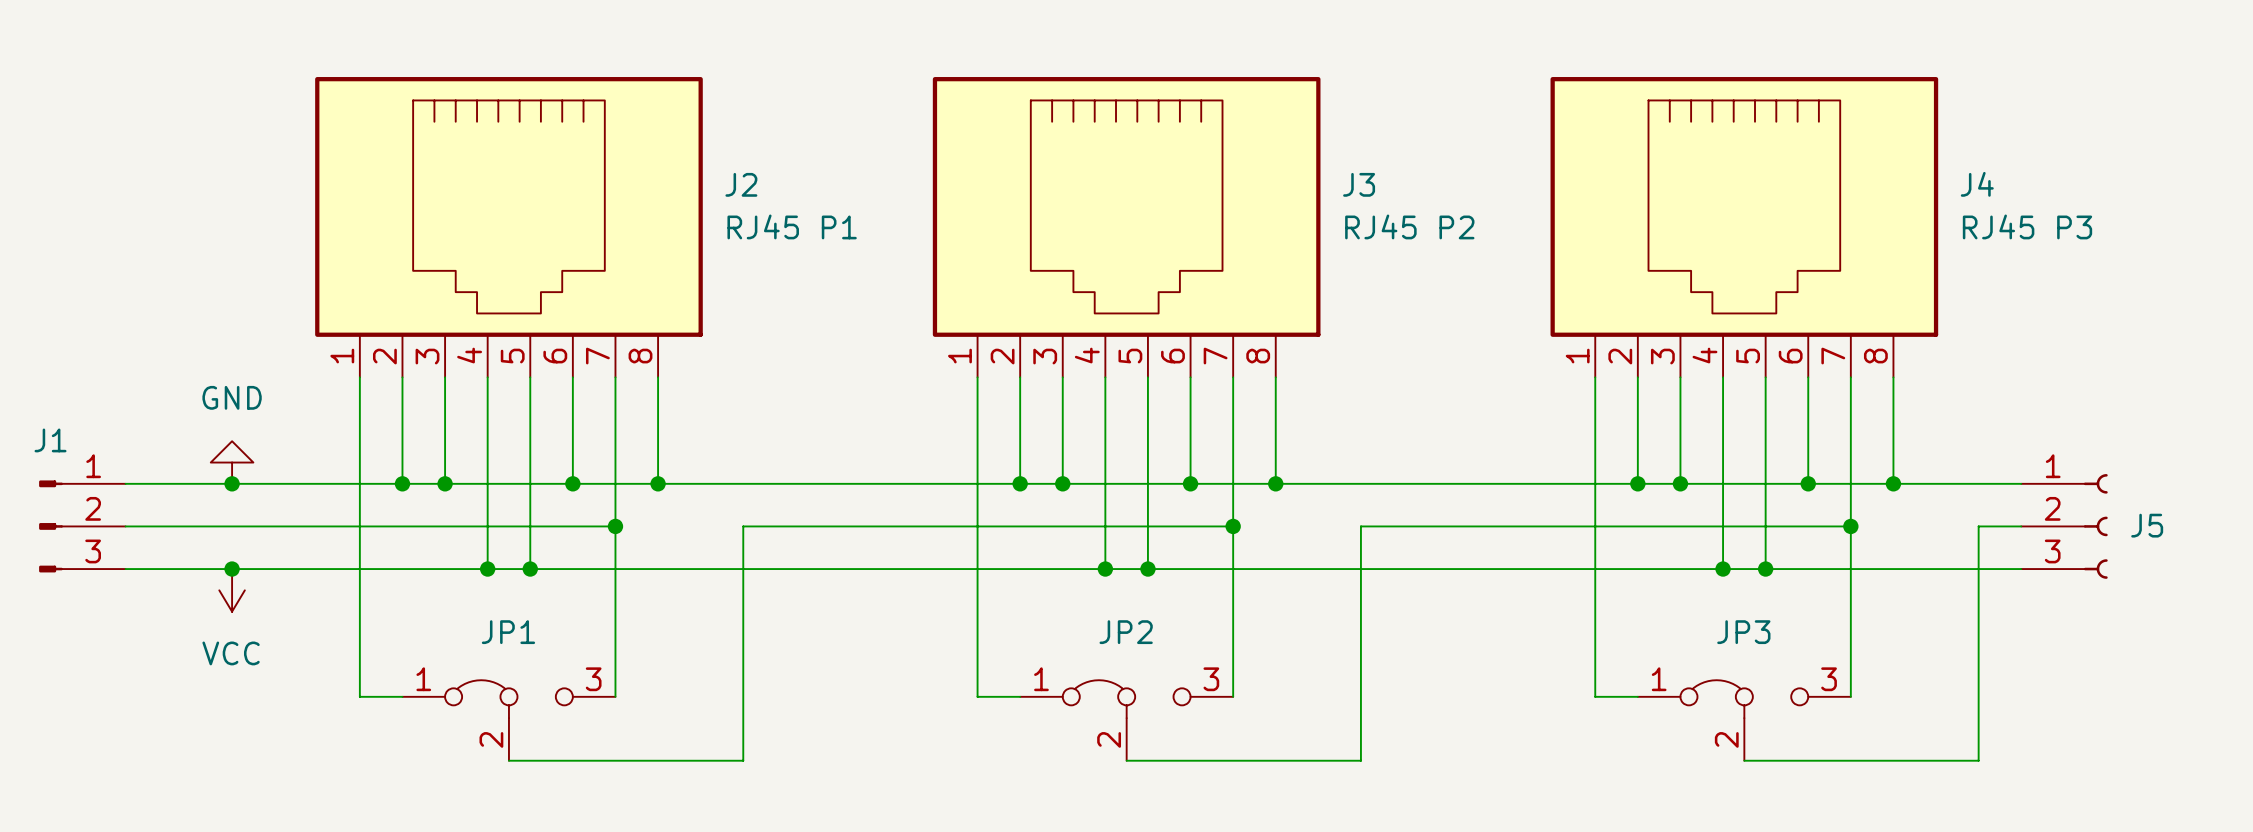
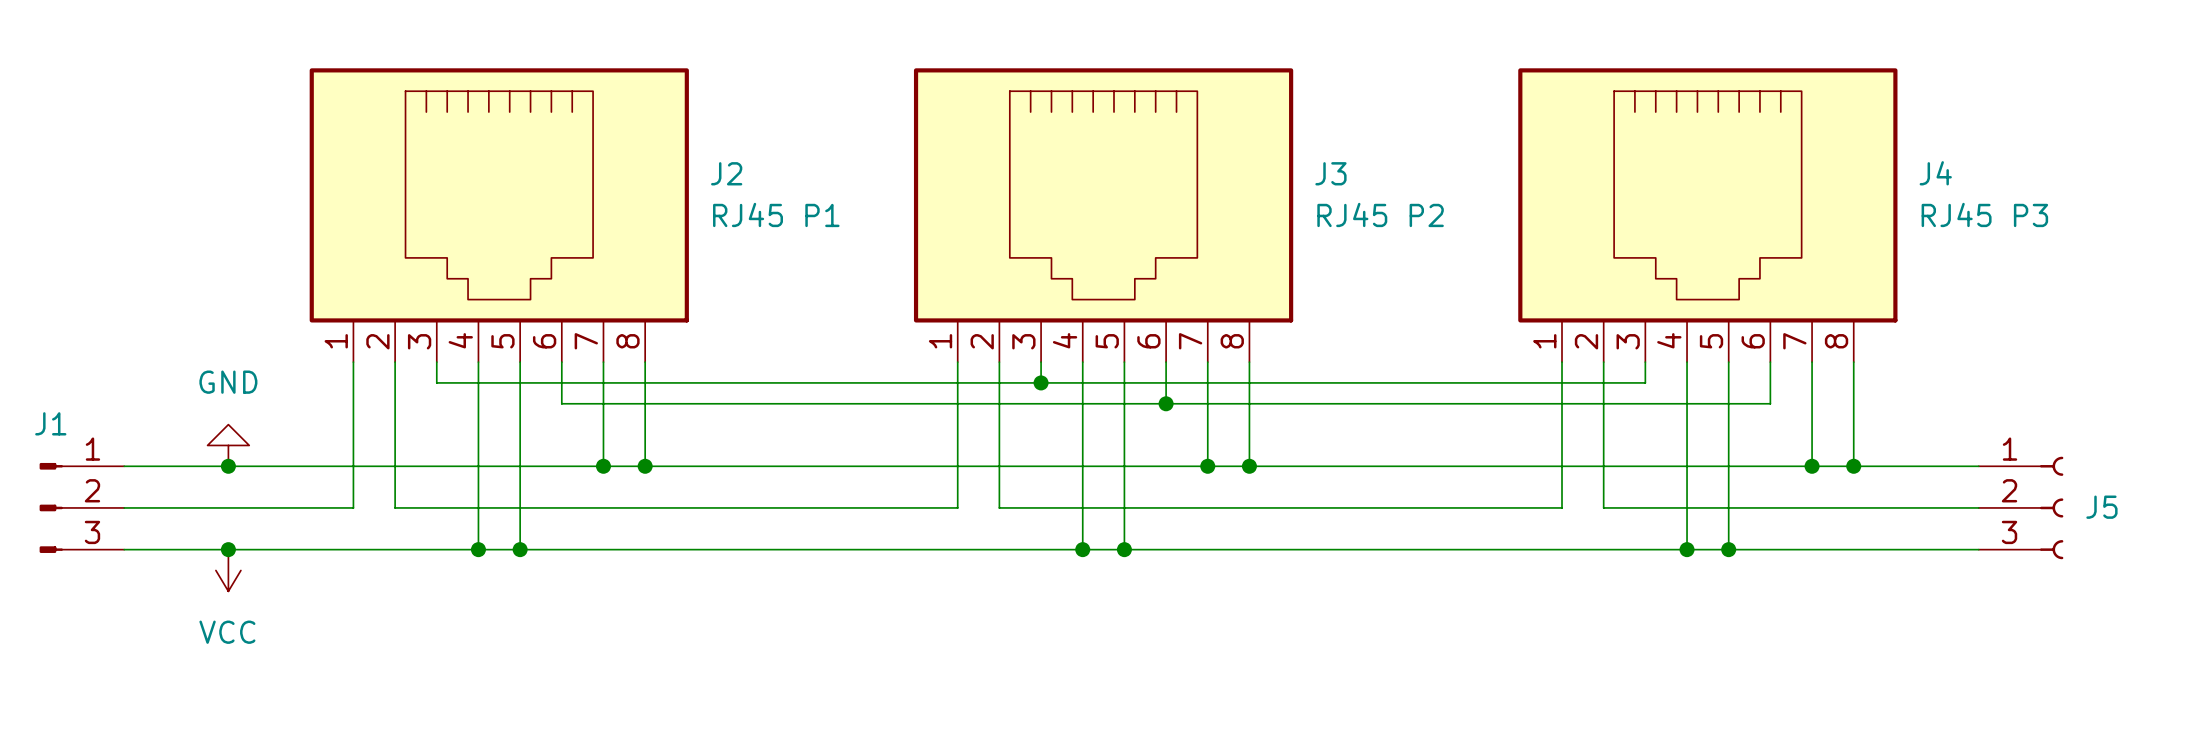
wire: (445, 398) (445, 483) -> (436, 382) (1645, 382)
wire: (1062, 398) (1062, 483) -> none
junction: none -> (1041, 382)
wire: (1680, 398) (1680, 483) -> none
wire: (572, 419) (572, 483) -> (561, 403) (1770, 403)
wire: (1190, 419) (1190, 483) -> none
junction: none -> (1166, 403)
wire: (1808, 419) (1808, 483) -> none
junction: (402, 483) -> none
junction: (445, 483) -> none
junction: (572, 483) -> none
wire: (615, 483) (615, 696) -> none
junction: none -> (603, 466)
junction: (1020, 483) -> none
junction: (1062, 483) -> none
junction: (1190, 483) -> none
wire: (1233, 483) (1233, 696) -> none
junction: none -> (1207, 466)
junction: (1637, 483) -> none
junction: (1680, 483) -> none
junction: (1808, 483) -> none
wire: (1850, 483) (1850, 696) -> none
junction: none -> (1812, 466)
wire: (402, 526) (359, 526) (359, 696) (402, 696) -> (395, 507) (395, 466)
junction: (615, 526) -> none
wire: (743, 526) (743, 760) (508, 760) -> (728, 507) (603, 507)
wire: (1020, 526) (977, 526) (977, 696) (1020, 696) -> (999, 507) (999, 466)
junction: (1233, 526) -> none
wire: (1360, 526) (1360, 760) (1126, 760) -> (1332, 507) (1207, 507)
wire: (1637, 526) (1595, 526) (1595, 696) (1637, 696) -> (1603, 507) (1603, 466)
junction: (1850, 526) -> none
wire: (1978, 526) (1978, 760) (1744, 760) -> (1937, 507) (1812, 507)
JP1: (508, 720) -> none
JP2: (1126, 720) -> none
JP3: (1744, 720) -> none

